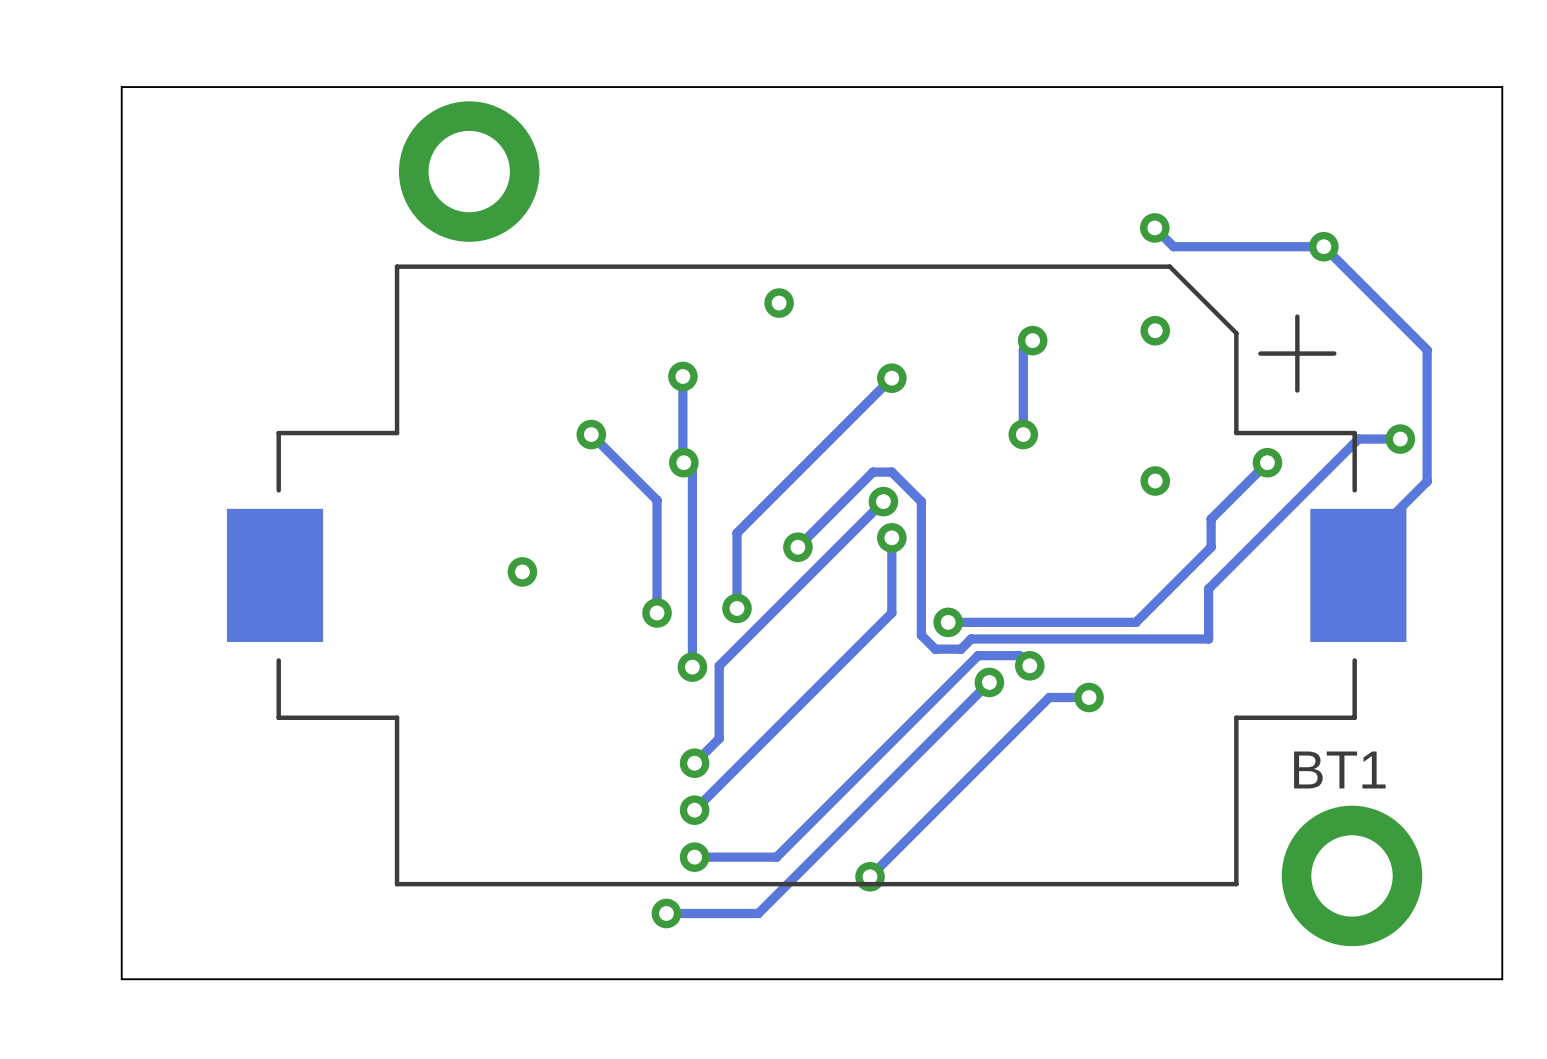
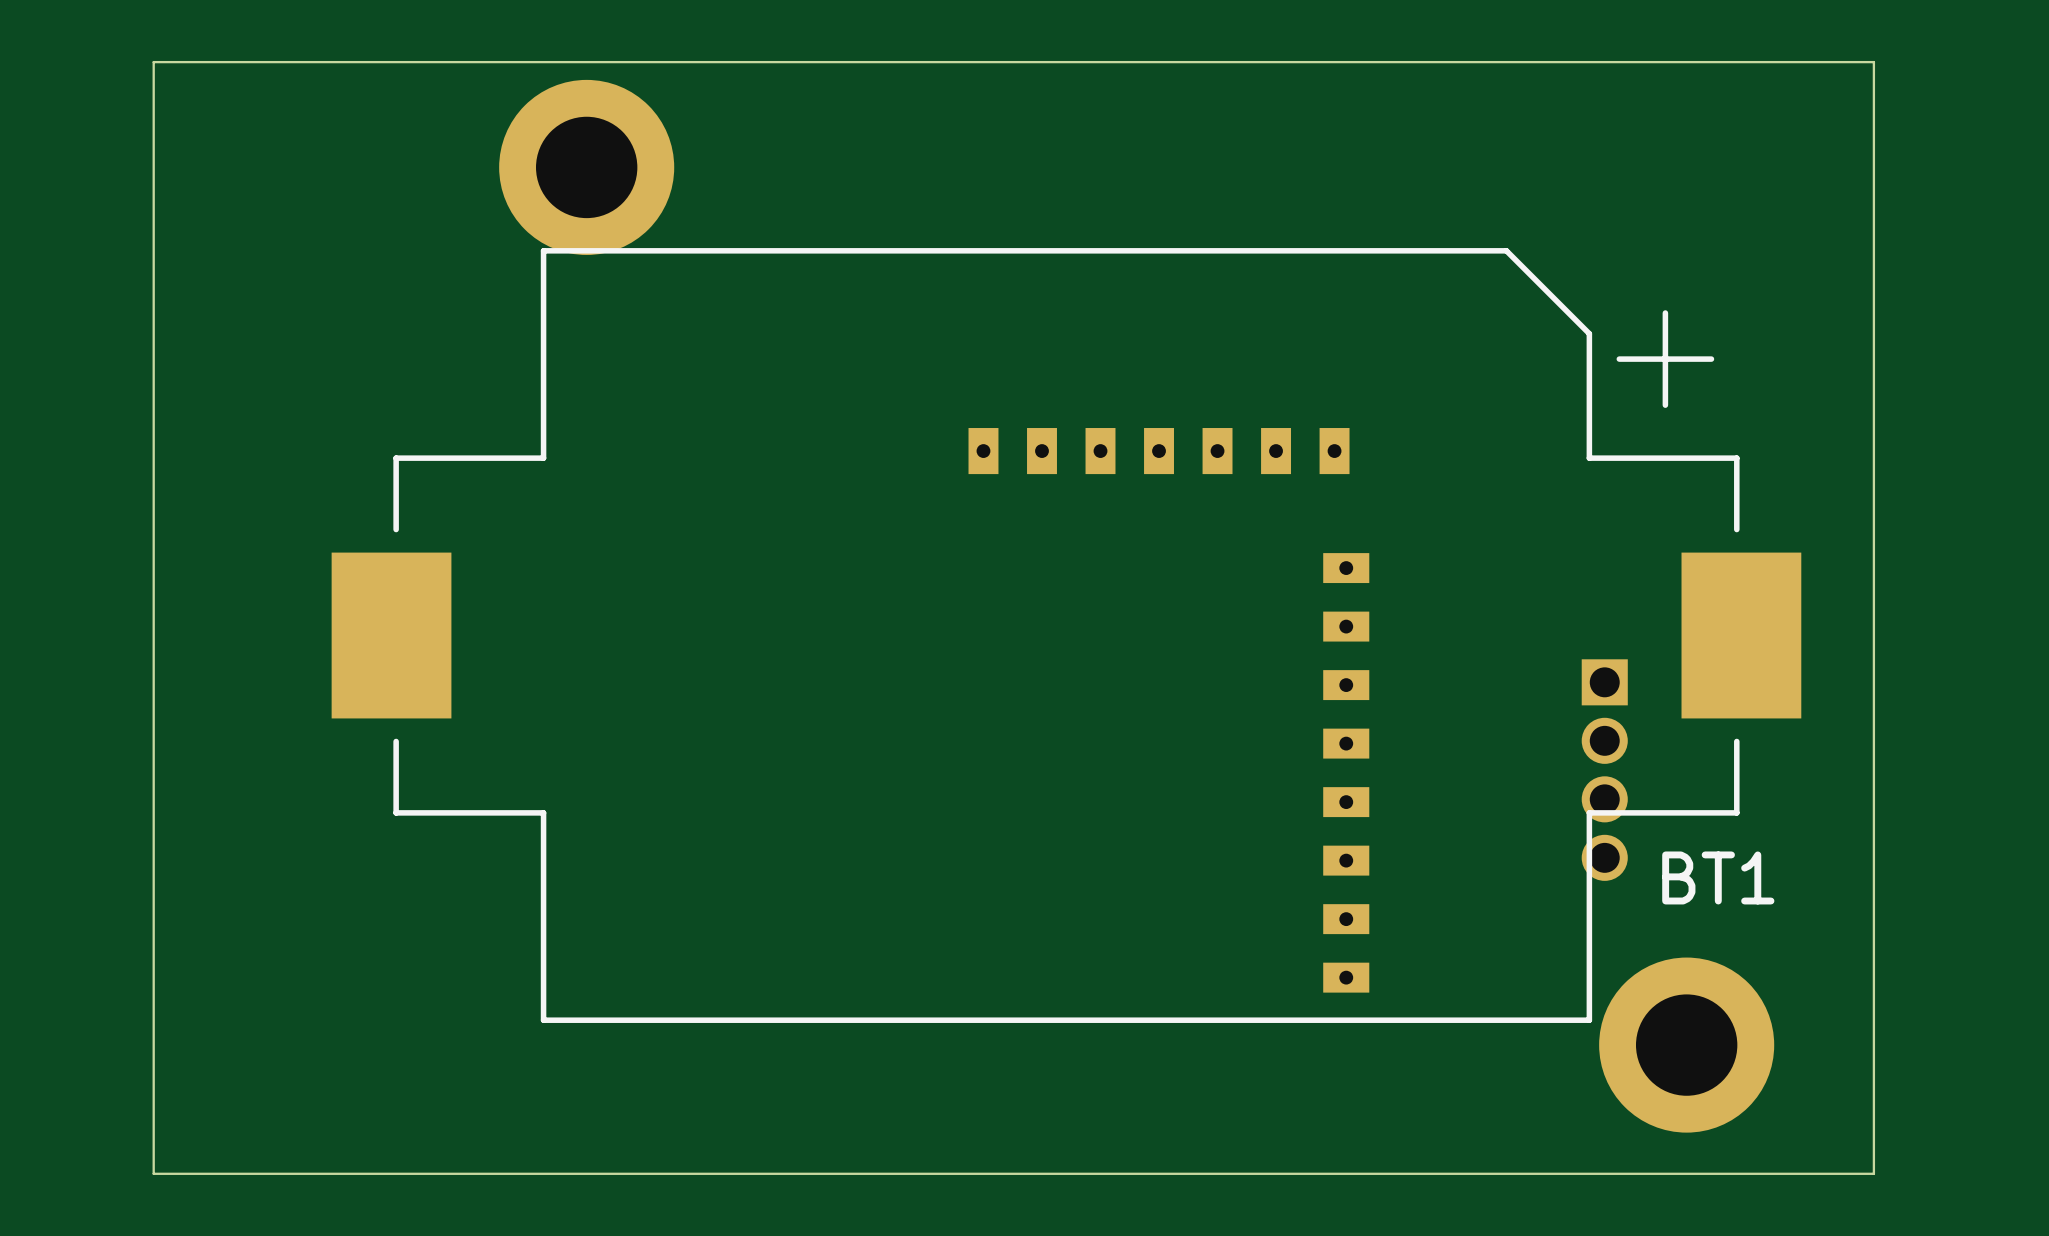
track: (1154, 227) (1173, 246) (1323, 246) (1427, 350) (1427, 481) (1367, 540) (1367, 556) -> none
via: (1154, 227) -> none
via: (1323, 246) -> none
via: (779, 303) -> none
via: (1155, 330) -> none
track: (1032, 340) (1023, 350) (1023, 434) -> none
via: (1032, 340) -> none
track: (682, 376) (682, 461) (692, 471) (692, 667) -> none
via: (682, 376) -> none
track: (891, 378) (737, 533) (737, 608) -> none
via: (891, 378) -> none
track: (591, 434) (657, 500) (657, 612) -> none
via: (591, 434) -> none
via: (1023, 434) -> none
track: (1400, 439) (1358, 439) (1208, 588) (1208, 639) (971, 639) (961, 649) (935, 649) (921, 635) (921, 501) (891, 472) (873, 472) (797, 547) -> none
via: (1400, 439) -> none
via: (683, 462) -> none
track: (1267, 462) (1211, 519) (1211, 547) (1136, 622) (948, 622) -> none
via: (1267, 462) -> none
via: (1155, 481) -> none
track: (883, 501) (719, 665) (719, 738) (694, 763) -> none
via: (883, 501) -> none
track: (891, 537) (891, 612) (694, 810) -> none
via: (891, 537) -> none
via: (797, 547) -> none
via: (522, 571) -> none
BT1 position: (816, 575) -> (1066, 635)
part: none -> (1168, 710)
via: (737, 608) -> none
via: (657, 612) -> none
via: (948, 622) -> none
part: none -> (1604, 770)
track: (1029, 665) (1019, 655) (978, 655) (776, 857) (694, 857) -> none
via: (1029, 665) -> none
via: (692, 667) -> none
track: (989, 682) (758, 913) (666, 913) -> none
via: (989, 682) -> none
track: (1089, 697) (1049, 697) (870, 876) -> none
via: (1089, 697) -> none
via: (694, 763) -> none
via: (694, 810) -> none
via: (694, 857) -> none
via: (870, 876) -> none
via: (666, 913) -> none

